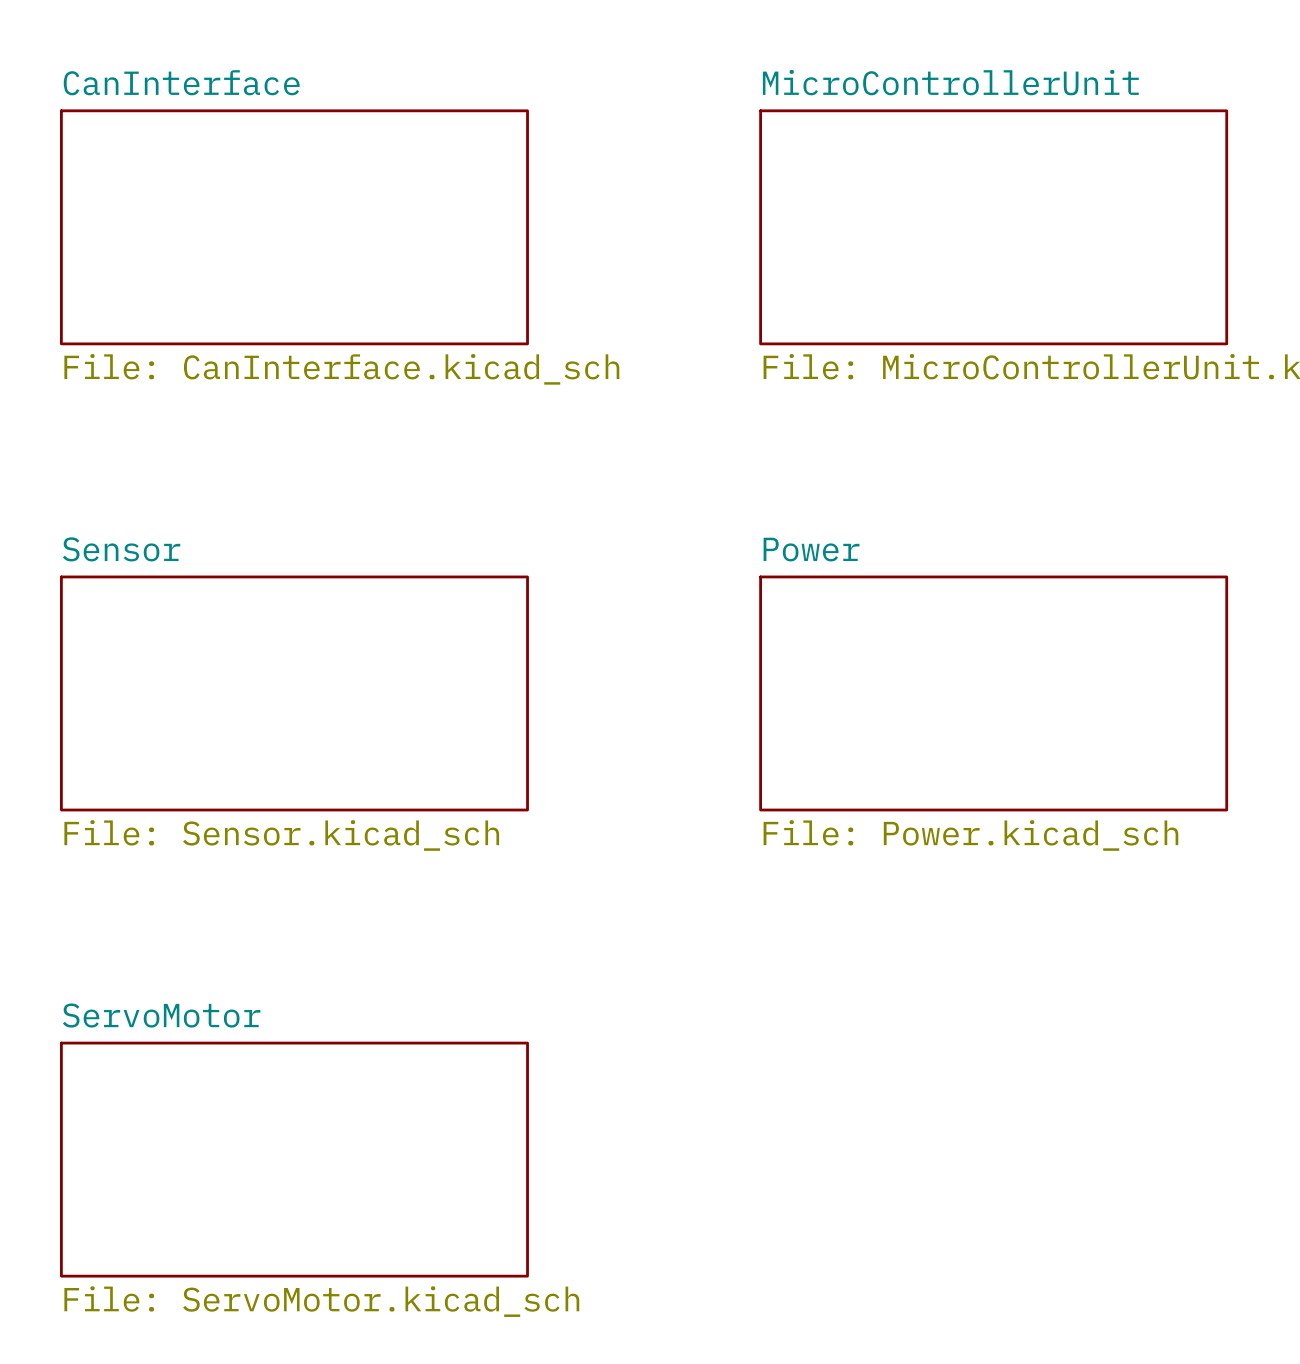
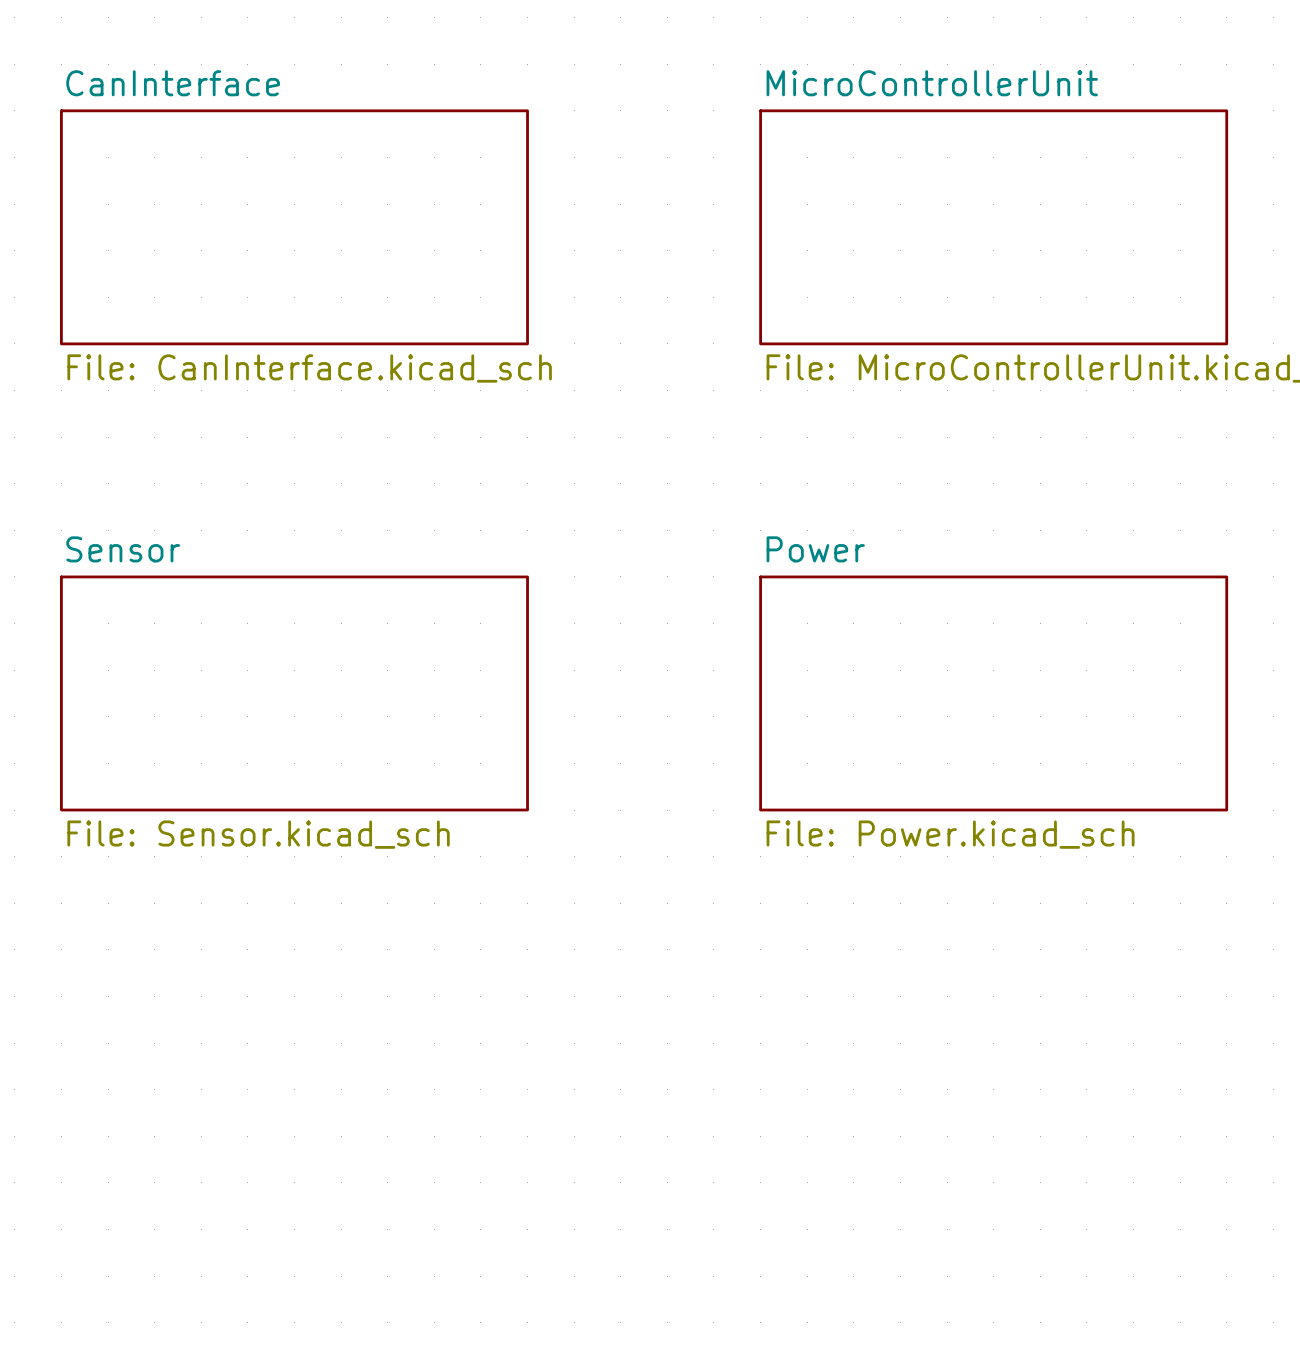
sheet ServoMotor: File: ServoMotor.kicad_sch (294, 1159) -> none

